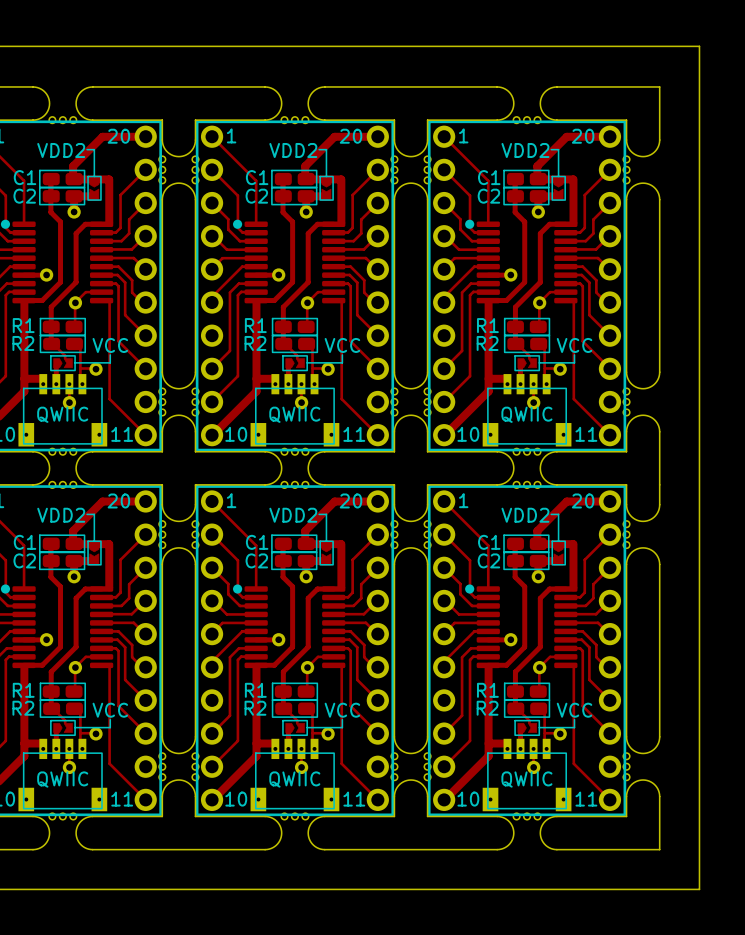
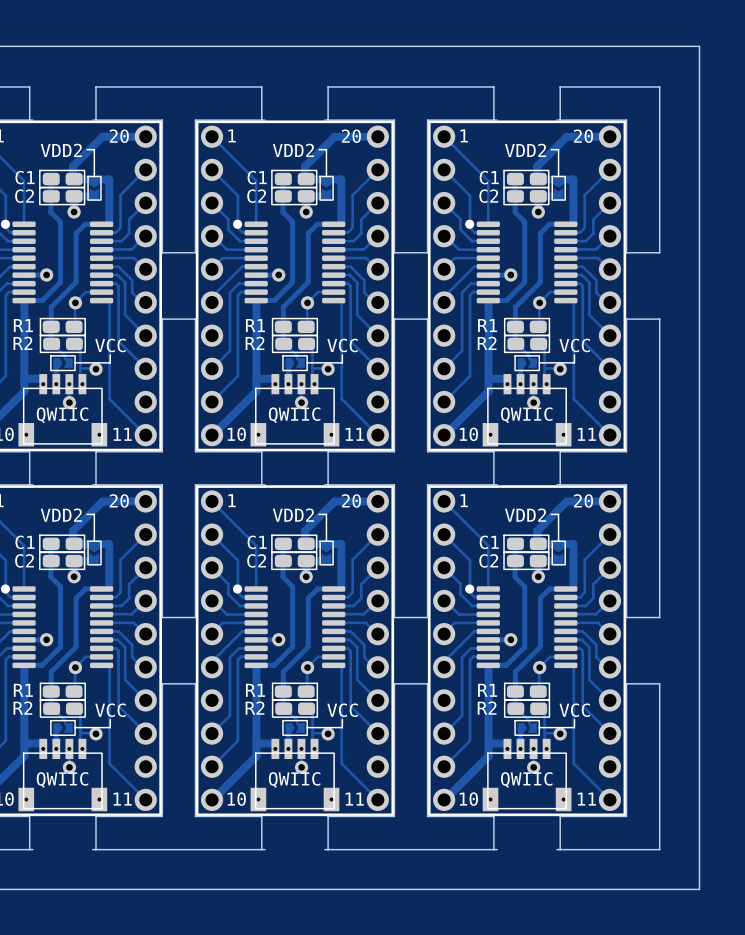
board edge: (29, 86) (32, 86) -> (29, 86) (29, 120)
board edge: (92, 86) (95, 86) -> (95, 120) (95, 86)
board edge: (261, 86) (265, 86) -> (261, 86) (261, 120)
board edge: (324, 86) (328, 86) -> (328, 120) (328, 86)
board edge: (493, 86) (497, 86) -> (493, 86) (493, 120)
board edge: (556, 86) (560, 86) -> (560, 120) (560, 86)
part: (62, 104) -> none
part: (294, 104) -> none
part: (527, 104) -> none
board edge: none -> (162, 140) (162, 199)
board edge: none -> (195, 140) (195, 199)
board edge: none -> (394, 140) (394, 199)
board edge: none -> (427, 140) (427, 199)
board edge: none -> (626, 140) (626, 199)
board edge: none -> (659, 140) (659, 199)
part: (178, 169) -> none
part: (411, 169) -> none
part: (641, 169) -> none
board edge: (162, 252) (162, 319) -> (162, 252) (195, 252)
board edge: (195, 252) (195, 319) -> (162, 319) (195, 319)
board edge: (394, 252) (394, 319) -> (394, 252) (427, 252)
board edge: (427, 252) (427, 319) -> (394, 319) (427, 319)
board edge: (626, 252) (626, 319) -> (626, 252) (659, 252)
board edge: (659, 252) (659, 319) -> (626, 319) (659, 319)
board edge: none -> (162, 372) (162, 431)
board edge: none -> (195, 372) (195, 431)
board edge: none -> (394, 372) (394, 431)
board edge: none -> (427, 372) (427, 431)
board edge: none -> (626, 372) (626, 431)
board edge: none -> (659, 372) (659, 431)
part: (178, 401) -> none
part: (411, 401) -> none
part: (641, 401) -> none
board edge: (29, 451) (32, 451) -> (29, 451) (29, 484)
board edge: (92, 451) (95, 451) -> (95, 484) (95, 451)
board edge: (261, 451) (265, 451) -> (261, 451) (261, 484)
board edge: (324, 451) (328, 451) -> (328, 484) (328, 451)
board edge: (493, 451) (497, 451) -> (493, 451) (493, 484)
board edge: (556, 451) (560, 451) -> (560, 484) (560, 451)
part: (62, 468) -> none
part: (294, 468) -> none
part: (527, 468) -> none
board edge: none -> (162, 504) (162, 564)
board edge: none -> (195, 504) (195, 564)
board edge: none -> (394, 504) (394, 564)
board edge: none -> (427, 504) (427, 564)
board edge: none -> (626, 504) (626, 564)
board edge: none -> (659, 504) (659, 564)
part: (178, 534) -> none
part: (411, 534) -> none
part: (641, 534) -> none
board edge: (162, 617) (162, 683) -> (162, 617) (195, 617)
board edge: (195, 617) (195, 683) -> (162, 683) (195, 683)
board edge: (394, 617) (394, 683) -> (394, 617) (427, 617)
board edge: (427, 617) (427, 683) -> (394, 683) (427, 683)
board edge: (626, 617) (626, 683) -> (626, 617) (659, 617)
board edge: (659, 617) (659, 683) -> (626, 683) (659, 683)
board edge: none -> (162, 736) (162, 796)
board edge: none -> (195, 736) (195, 796)
board edge: none -> (394, 736) (394, 796)
board edge: none -> (427, 736) (427, 796)
board edge: none -> (626, 736) (626, 796)
board edge: none -> (659, 736) (659, 796)
part: (178, 766) -> none
part: (411, 766) -> none
part: (641, 766) -> none
board edge: (29, 816) (32, 816) -> (29, 816) (29, 849)
board edge: (92, 816) (95, 816) -> (95, 849) (95, 816)
board edge: (261, 816) (265, 816) -> (261, 816) (261, 849)
board edge: (324, 816) (328, 816) -> (328, 849) (328, 816)
board edge: (493, 816) (497, 816) -> (493, 816) (493, 849)
board edge: (556, 816) (560, 816) -> (560, 849) (560, 816)
part: (62, 831) -> none
part: (294, 831) -> none
part: (527, 831) -> none

